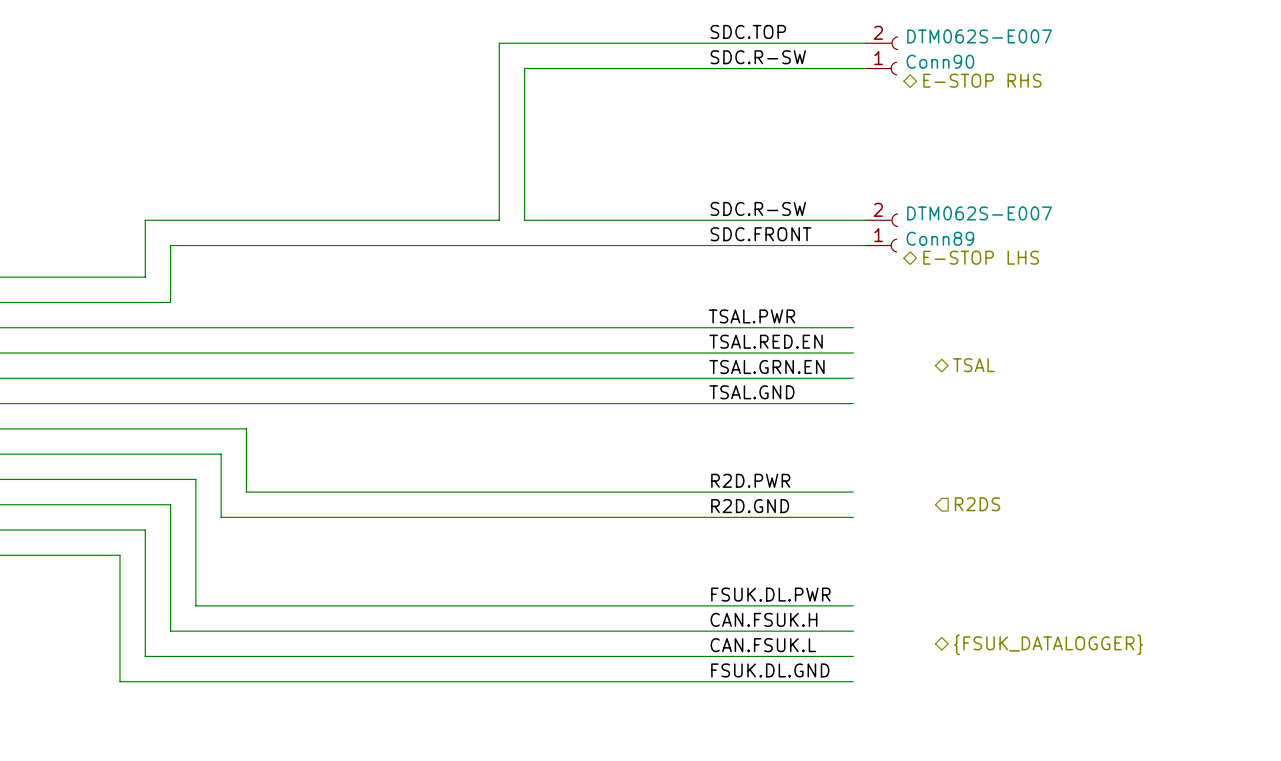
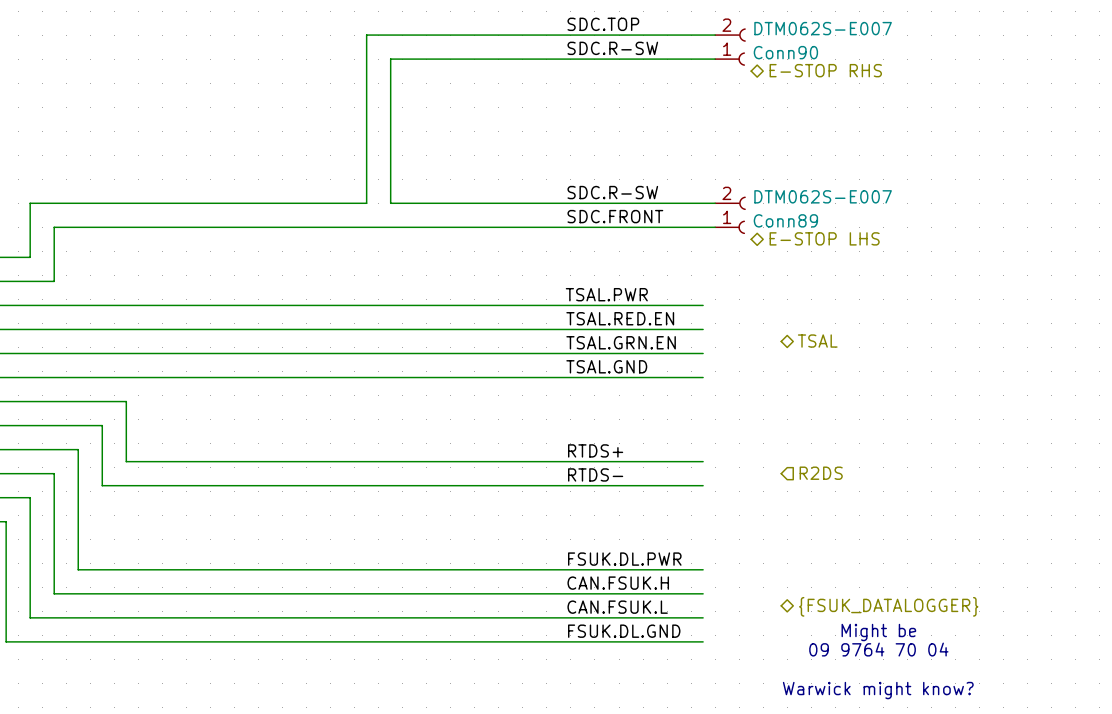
label: R2D.PWR (750, 480) -> RTDS+ (595, 450)
label: R2D.GND (750, 506) -> RTDS- (595, 474)
text: none -> Might be (878, 632)
text: none -> 09 9764 70 04 (878, 649)
text: none -> Warwick might know? (878, 690)

